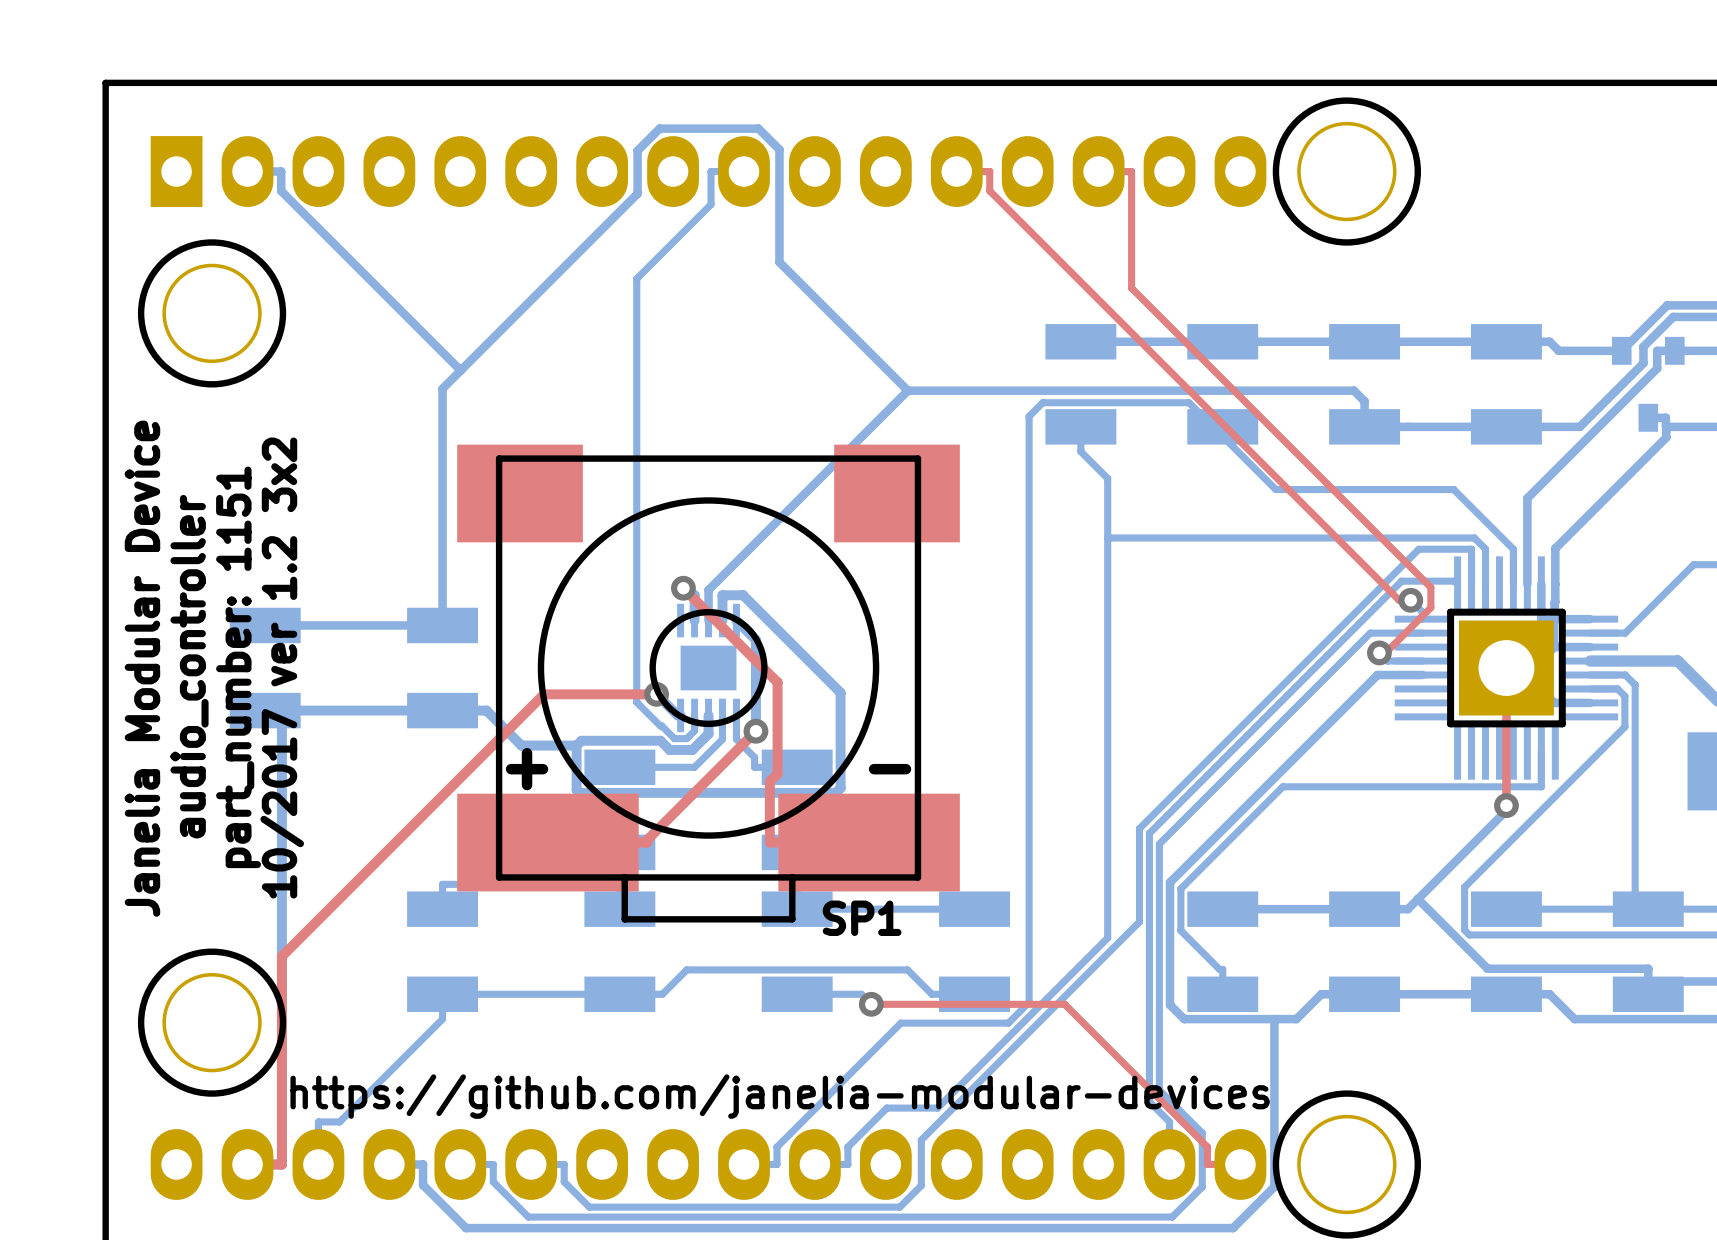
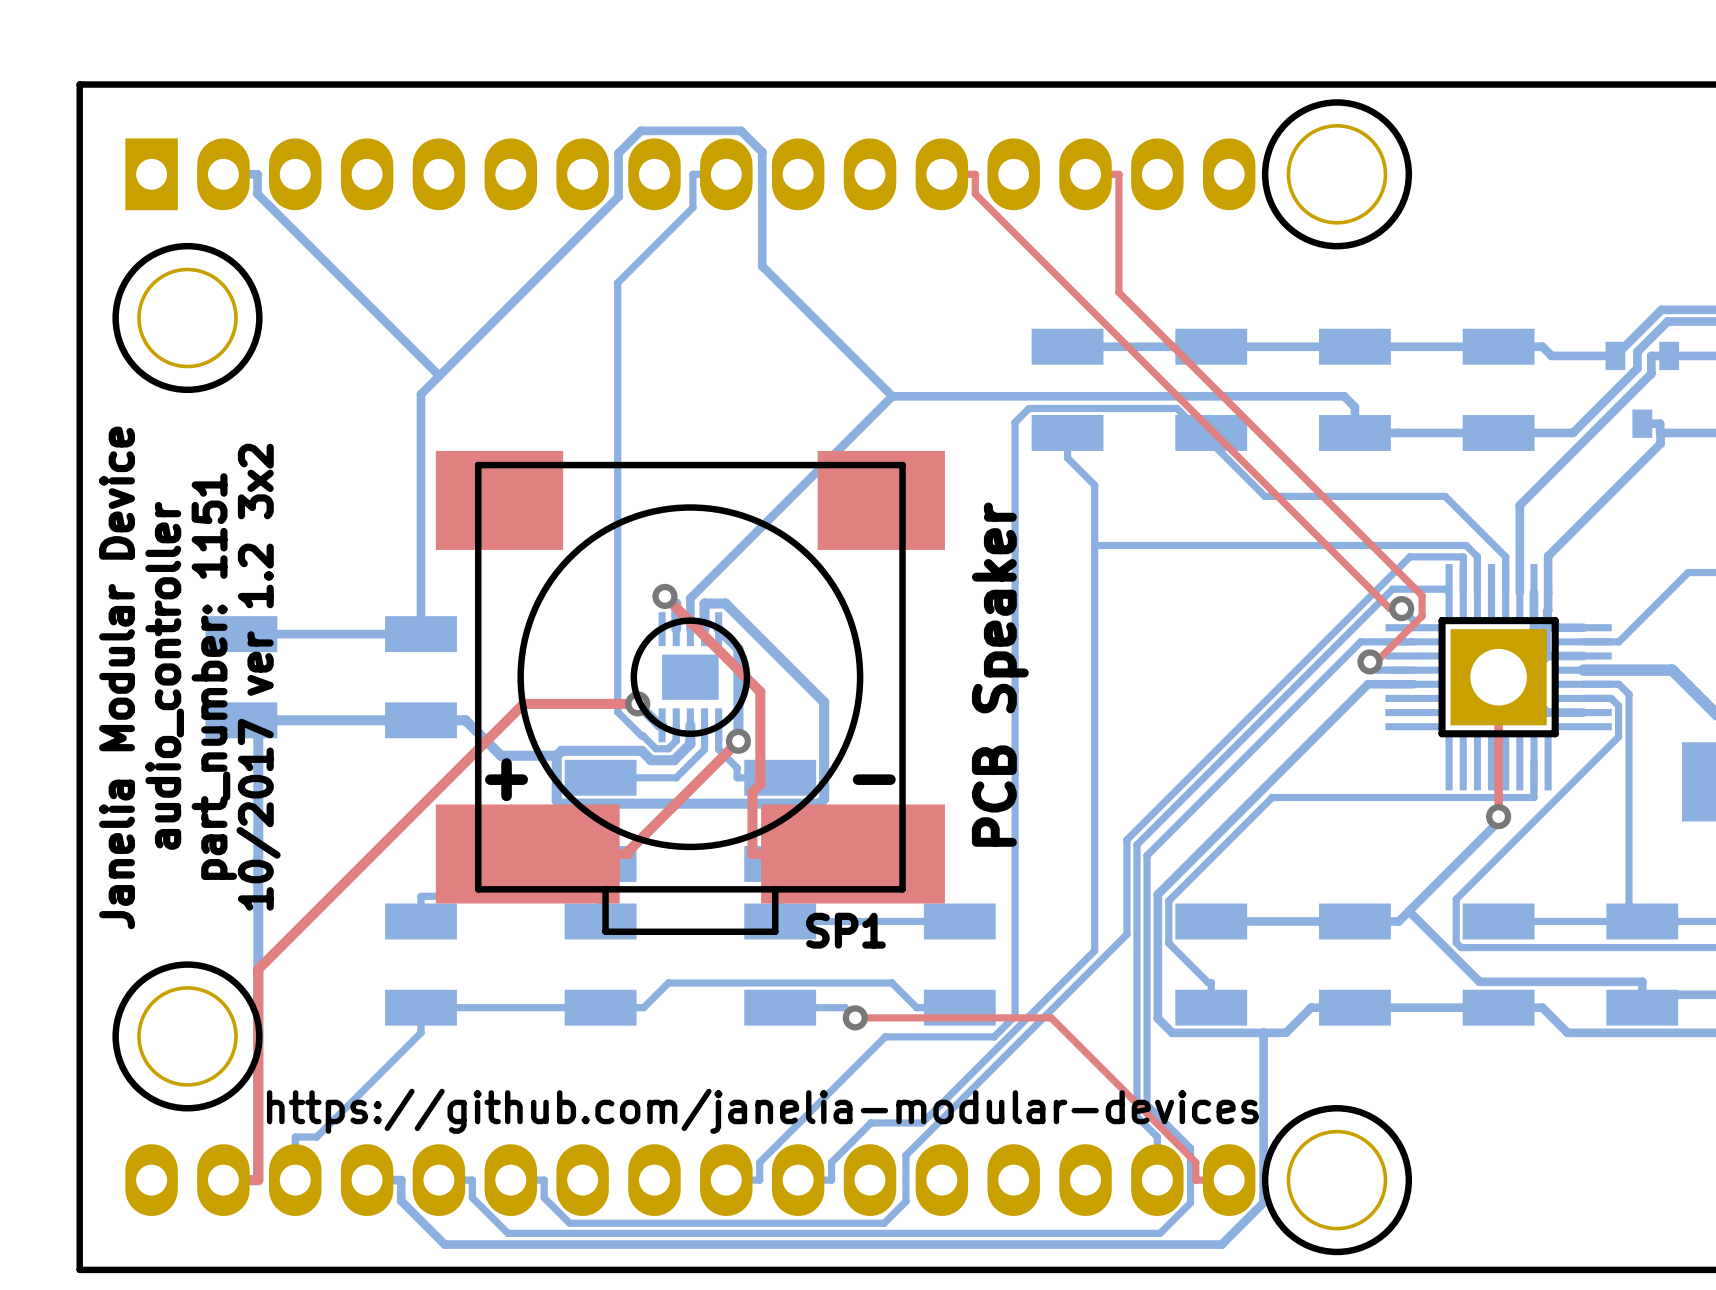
text: none -> PCB Speaker (1000, 674)

